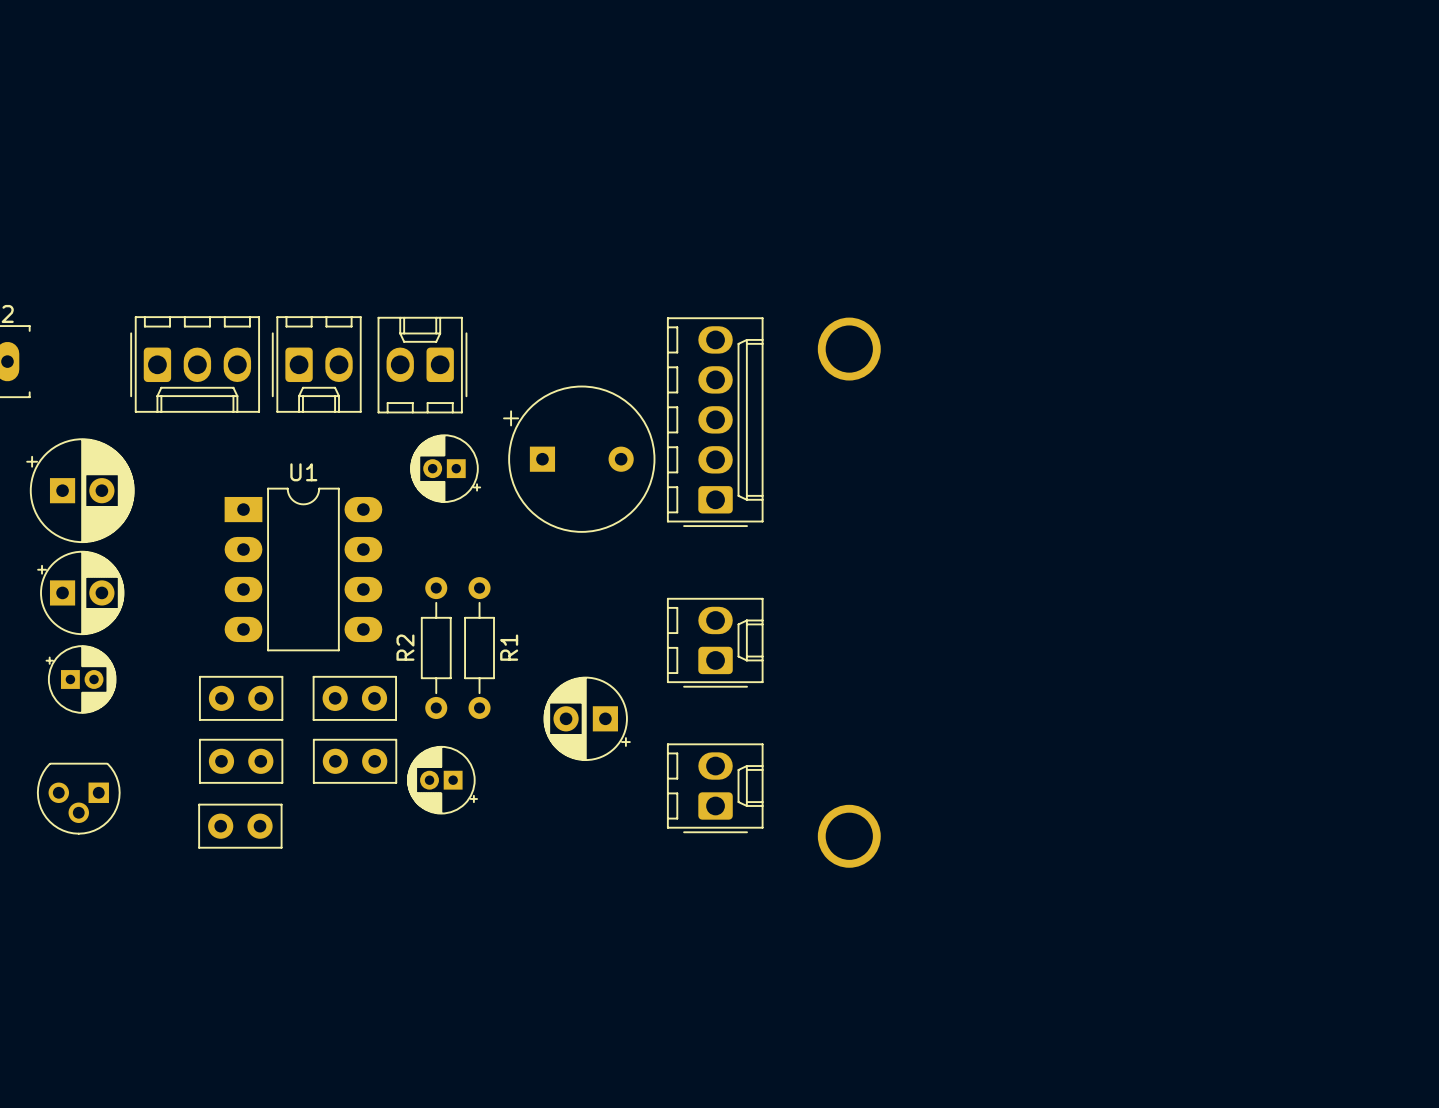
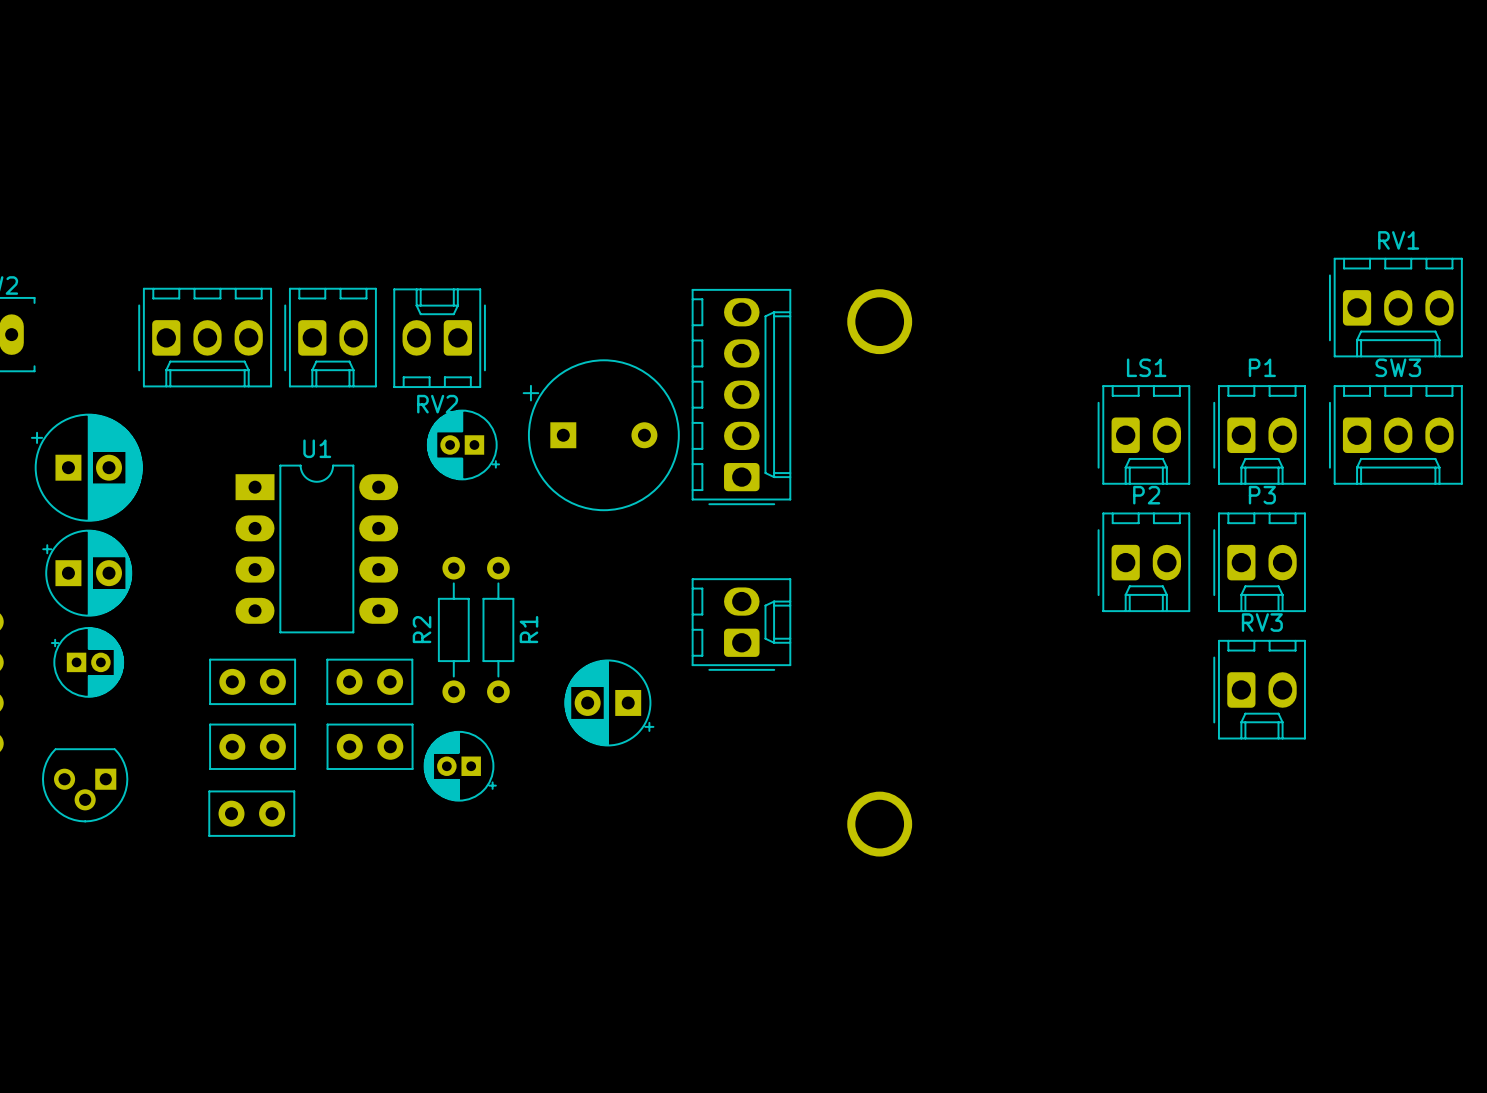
RV1: none -> (1395, 307)
RV2 name: none -> RV2 (437, 404)
LS1: none -> (1143, 434)
P1: none -> (1259, 434)
SW3: none -> (1395, 434)
P2: none -> (1143, 562)
P3: none -> (1259, 562)
RV3: none -> (1259, 689)
part: (715, 788) -> none

